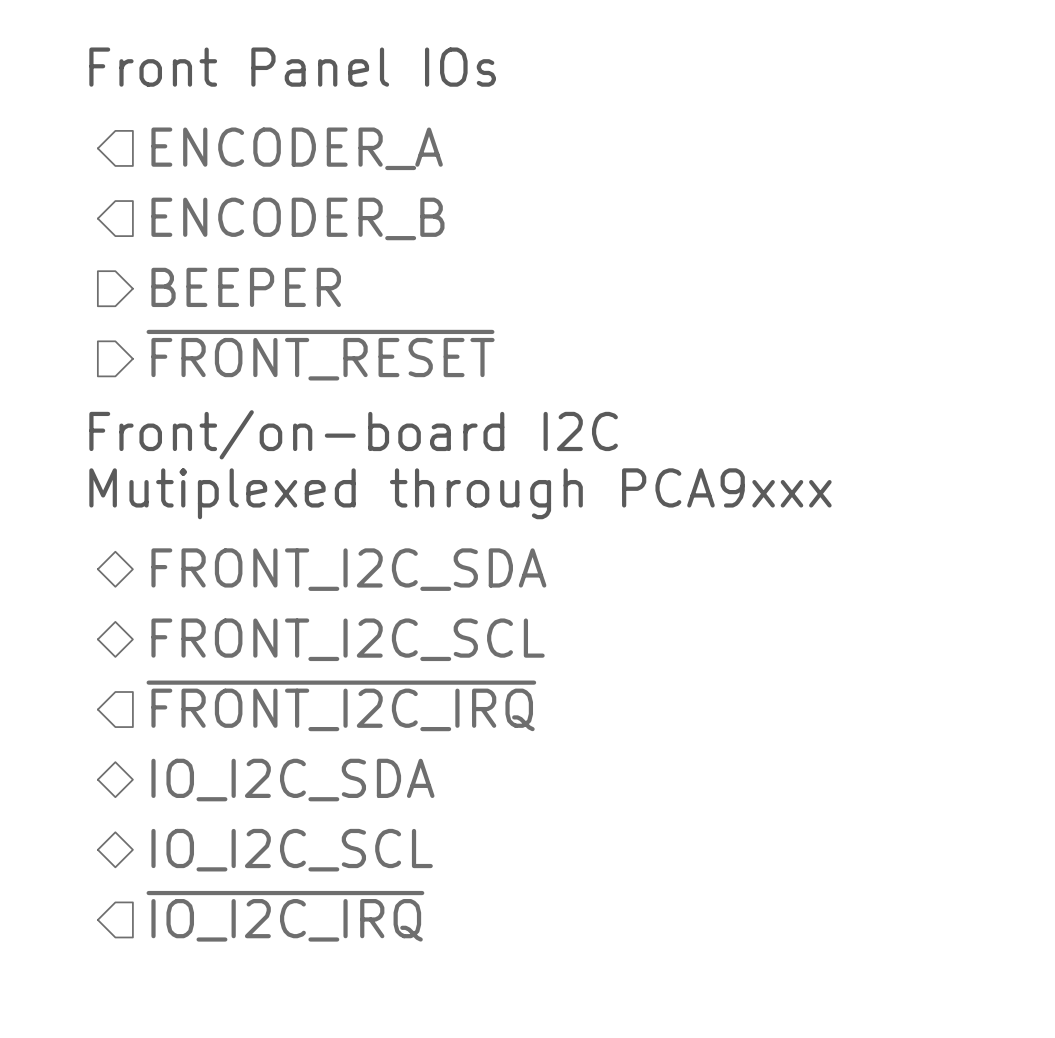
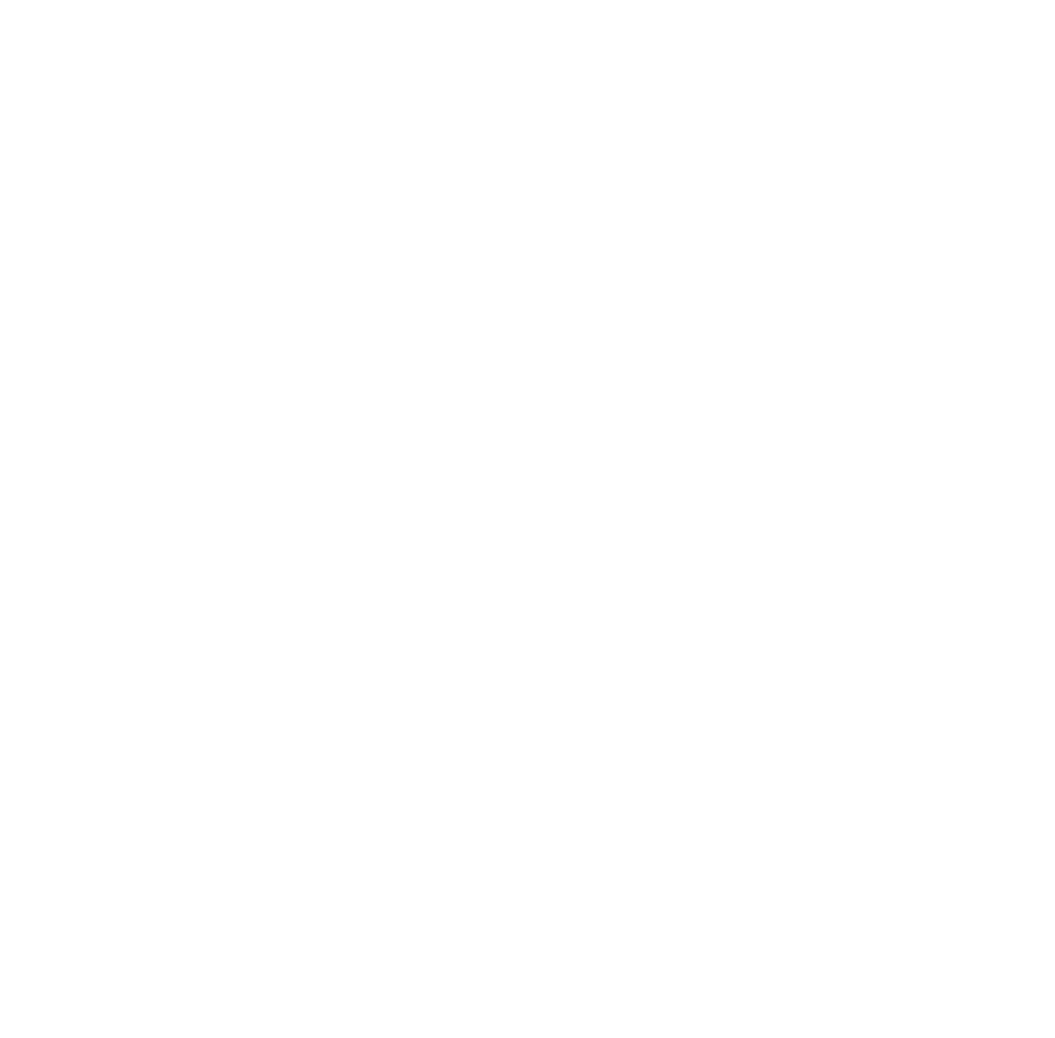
text: Front Panel IOs (292, 67) -> none
hierarchical label: ENCODER_A (297, 148) -> none
hierarchical label: ENCODER_B (297, 218) -> none
hierarchical label: BEEPER (246, 287) -> none
hierarchical label: ~{FRONT_RESET} (320, 355) -> none
text: Front/on-board I2C (353, 434) -> none
text: Mutiplexed through PCA9xxx (460, 493) -> none
hierarchical label: FRONT_I2C_SDA (348, 569) -> none
hierarchical label: FRONT_I2C_SCL (348, 639) -> none
hierarchical label: ~{FRONT_I2C_IRQ} (341, 705) -> none
hierarchical label: IO_I2C_SDA (292, 780) -> none
hierarchical label: IO_I2C_SCL (292, 850) -> none
hierarchical label: ~{IO_I2C_IRQ} (285, 916) -> none

